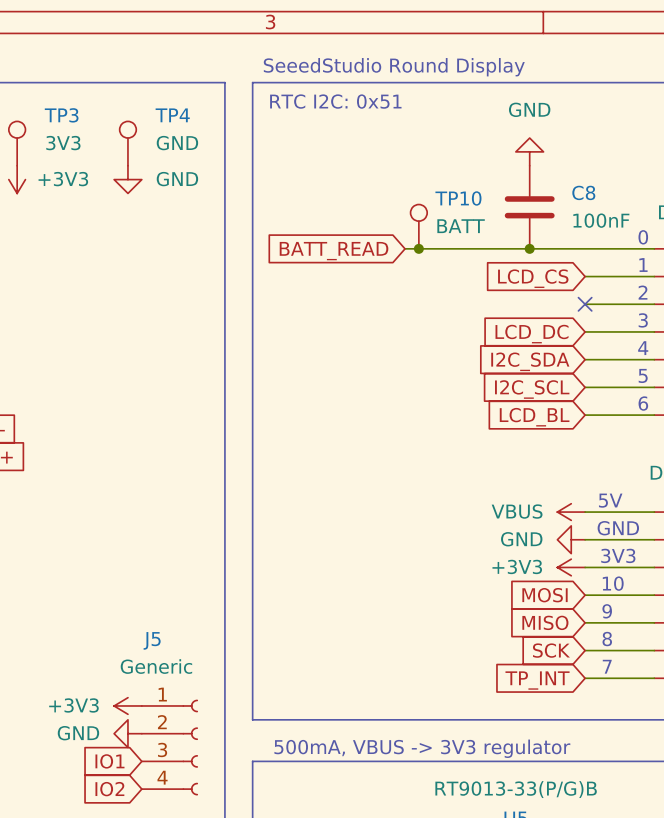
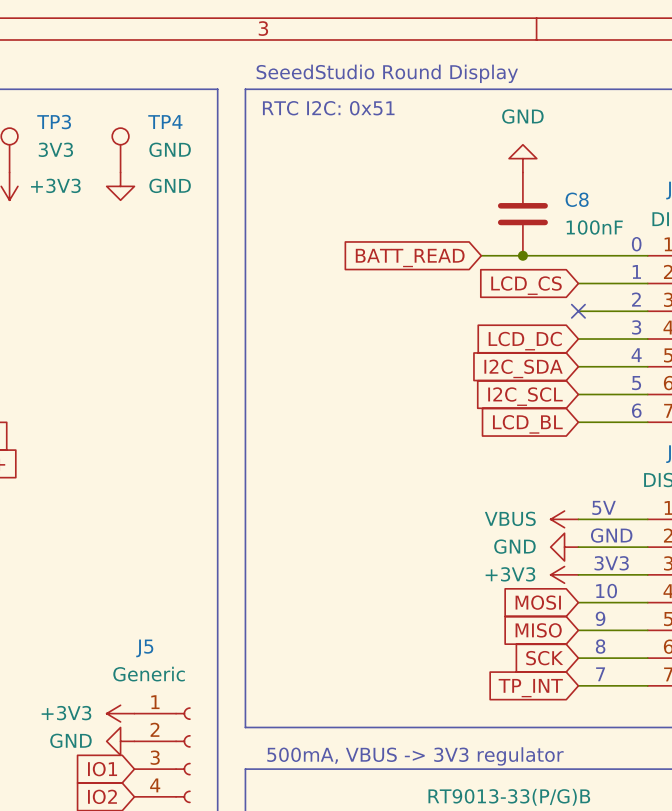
TP10: BATT (418, 226) -> none
wire: (405, 248) (488, 248) -> none
junction: (418, 248) -> none
global label position: BATT_READ (334, 251) -> BATT_READ (410, 258)

